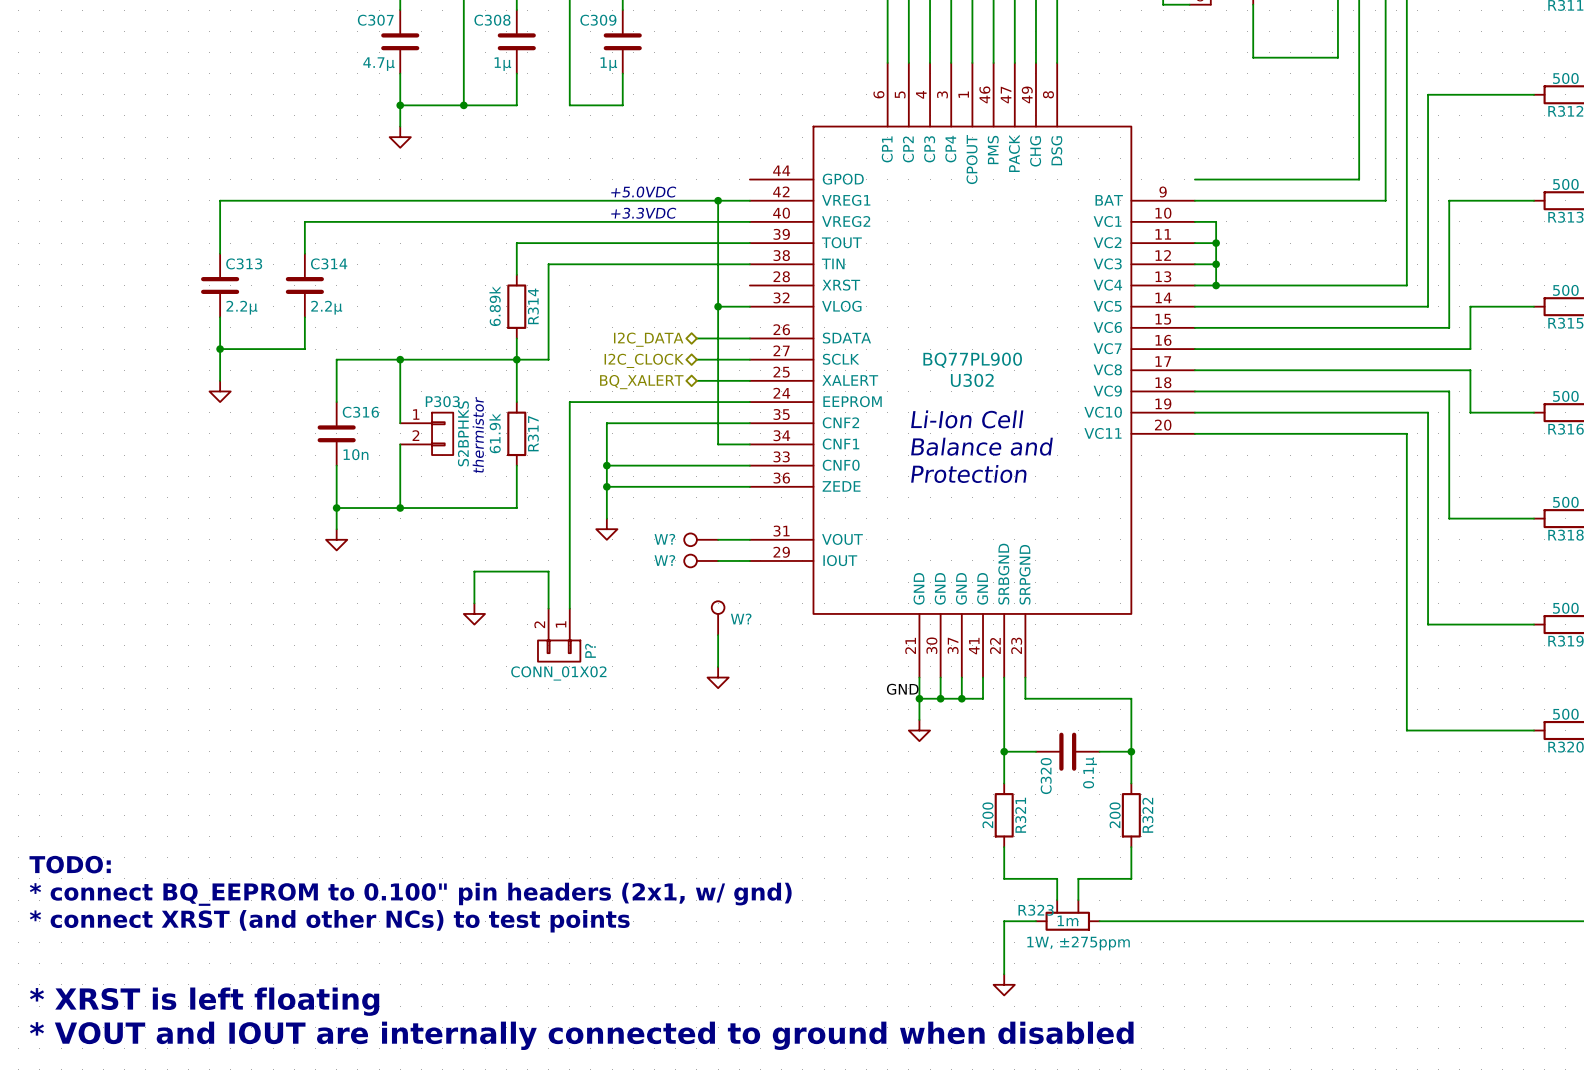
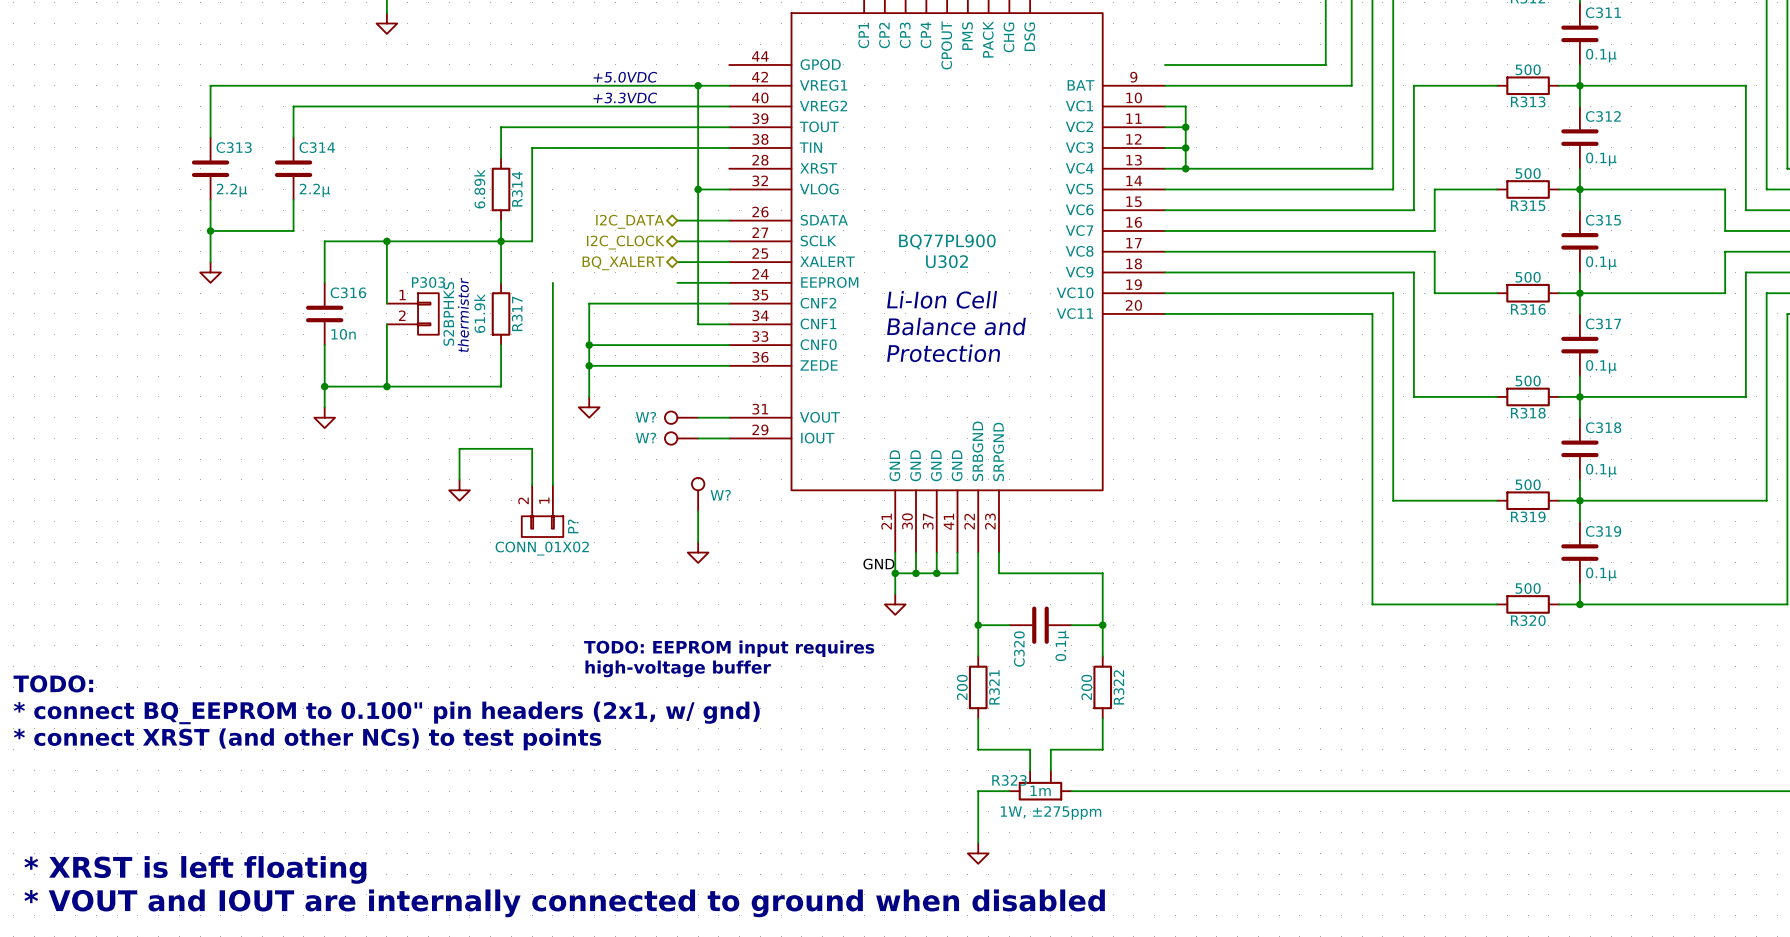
wire: (569, 402) (696, 402) -> none
text: none -> TODO: EEPROM input requires (729, 648)
text: none -> high-voltage buffer (678, 668)
text position: TODO: (70, 864) -> TODO: (53, 683)
text position: * connect BQ_EEPROM to 0.100" pin headers (2x1, w/ gnd) (410, 894) -> * connect BQ_EEPROM to 0.100" pin headers (2x1, w/ gnd) (386, 712)
text position: * connect XRST (and other NCs) to test points (329, 921) -> * connect XRST (and other NCs) to test points (307, 739)

